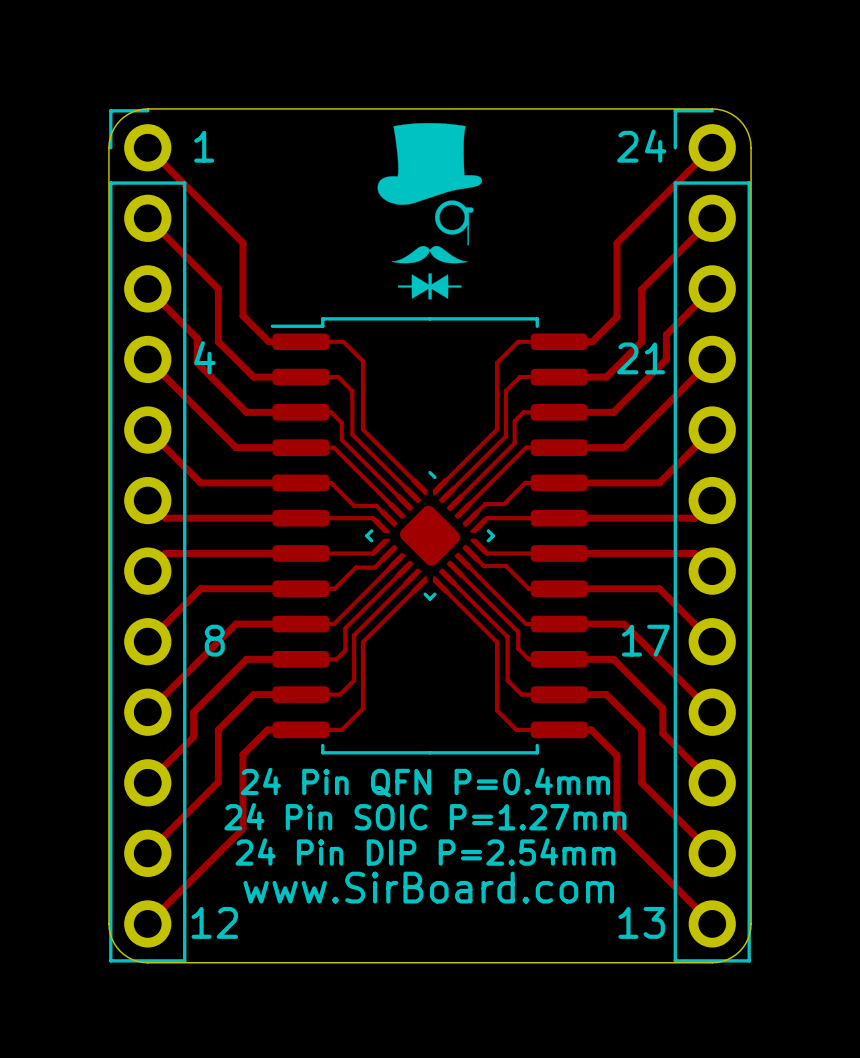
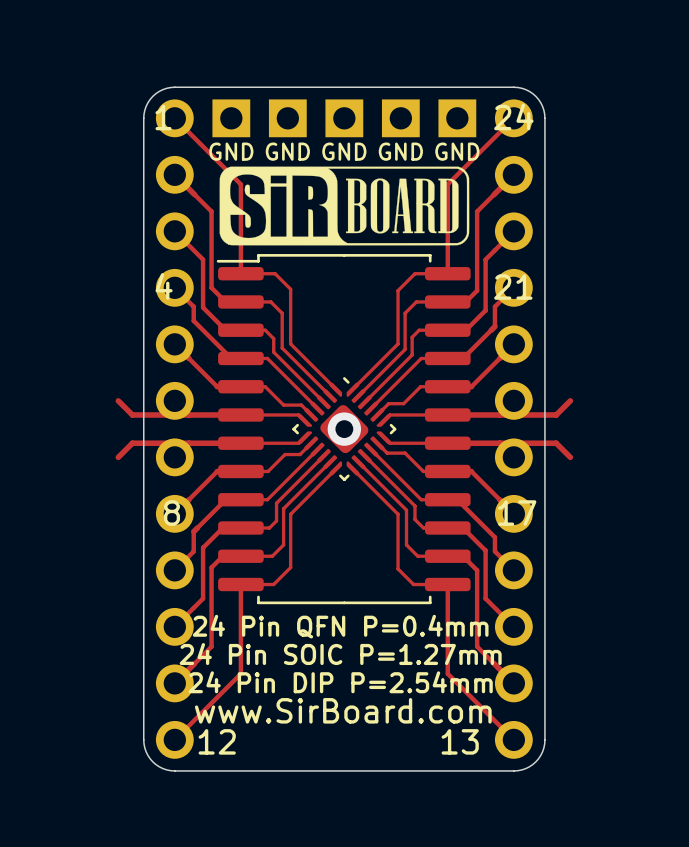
board edge: (218, 108) (147, 108) (132, 111) (124, 116) (114, 128) (108, 147) (109, 928) (116, 947) (128, 957) (137, 961) (218, 962) -> (174, 87) (162, 89) (152, 96) (146, 106) (143, 118) (143, 739) (146, 751) (152, 761) (162, 768) (174, 770)
board edge: (641, 108) (712, 108) (727, 111) (743, 124) (749, 137) (751, 147) (750, 928) (743, 947) (735, 954) (722, 961) (641, 962) -> (513, 87) (525, 89) (535, 96) (542, 106) (544, 118) (544, 739) (542, 751) (535, 761) (525, 768) (513, 770)
drawing: [377, 123, 482, 300] -> none
track: (147, 147) (218, 218) -> none
track: none -> (174, 118) (240, 184) (240, 273)
part: none -> (344, 118)
track: none -> (513, 118) (447, 184) (447, 273)
track: (712, 147) (641, 218) -> none
text: none -> GND (231, 151)
text: none -> GND (287, 151)
text: none -> GND (344, 151)
text: none -> GND (400, 151)
text: none -> GND (457, 151)
drawing: none -> [219, 166, 470, 246]
track: (147, 218) (218, 288) (218, 341) (253, 377) (281, 377) -> none
track: (712, 218) (641, 289) (641, 341) (606, 377) (581, 377) -> none
track: (243, 243) (243, 315) (268, 341) (296, 341) -> (194, 194) (211, 211) (211, 287) (225, 301)
track: (616, 243) (616, 317) (592, 341) (563, 341) -> (494, 194) (477, 211) (477, 290) (465, 301)
track: (147, 288) (197, 338) (197, 362) (246, 412) (281, 412) -> (174, 231) (203, 259) (203, 307) (225, 330)
track: none -> (513, 231) (485, 259) (485, 310) (465, 330)
track: (712, 288) (666, 334) (666, 359) (618, 407) -> (513, 287) (494, 306) (494, 326)
track: (147, 359) (218, 430) -> none
track: none -> (174, 287) (193, 306) (193, 320) (231, 358)
track: (712, 359) (641, 430) -> none
track: (581, 412) (613, 412) -> (463, 358) (491, 330)
track: (147, 430) (200, 482) (271, 482) -> none
track: (712, 430) (659, 482) (588, 482) -> none
track: (235, 447) (288, 447) -> (188, 358) (217, 386)
track: (578, 447) (624, 447) -> (471, 386) (499, 358)
part side: top (147, 535) -> bottom (174, 429)
via: none -> (344, 429)
part side: top (712, 535) -> bottom (513, 429)
track: (271, 588) (200, 588) (147, 641) -> none
track: (588, 588) (659, 588) (712, 641) -> none
track: (235, 624) (281, 624) -> (188, 499) (217, 471)
track: (571, 624) (624, 624) -> (471, 471) (499, 499)
track: none -> (457, 499) (494, 537) (494, 551) (513, 570)
track: (218, 641) (147, 712) -> none
track: (641, 641) (712, 712) -> none
track: (246, 659) (278, 659) -> (197, 527) (225, 499)
track: none -> (222, 527) (203, 547) (203, 598) (174, 626)
track: (578, 659) (613, 659) (662, 708) (662, 733) (712, 782) -> (463, 527) (485, 550) (485, 598) (513, 626)
track: (241, 663) (193, 712) (193, 736) (147, 782) -> (193, 531) (193, 551) (174, 570)
track: (278, 694) (253, 694) (218, 729) (218, 782) (147, 853) -> none
track: (578, 694) (606, 694) (641, 729) (641, 782) (712, 853) -> none
track: (296, 729) (267, 729) (243, 754) (243, 828) -> (222, 556) (211, 567) (211, 646) (194, 663)
track: none -> (240, 584) (240, 673) (174, 739)
track: none -> (447, 584) (447, 673) (513, 739)
track: (563, 729) (591, 729) (616, 755) (616, 828) -> (463, 556) (477, 570) (477, 646) (494, 663)
track: (218, 853) (147, 923) -> none
track: (641, 853) (712, 923) -> none
text position: 12 (214, 922) -> 12 (217, 741)
text position: 13 (641, 922) -> 13 (460, 741)

